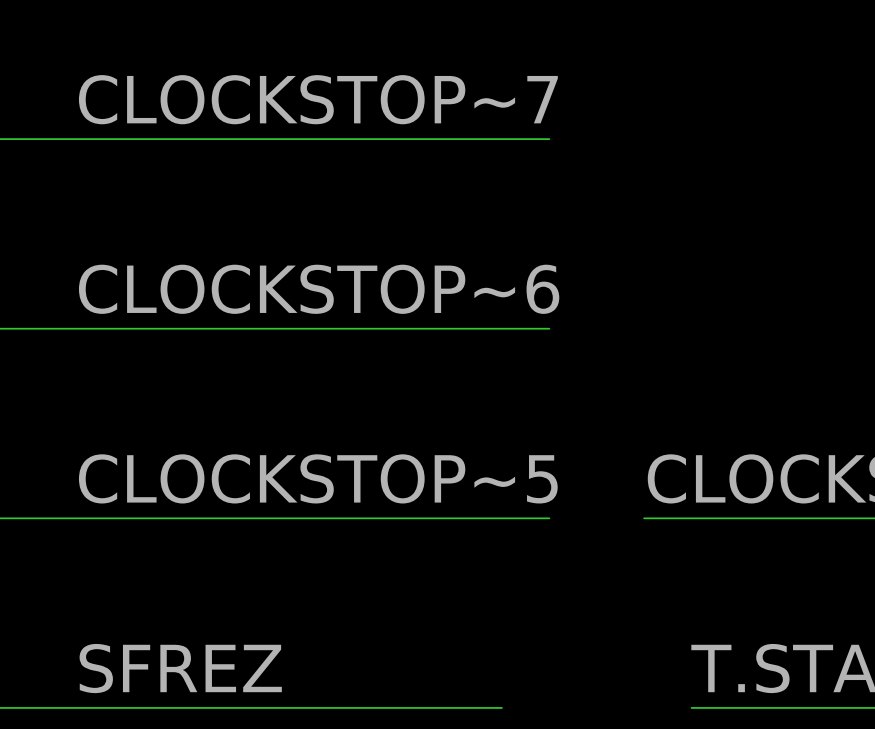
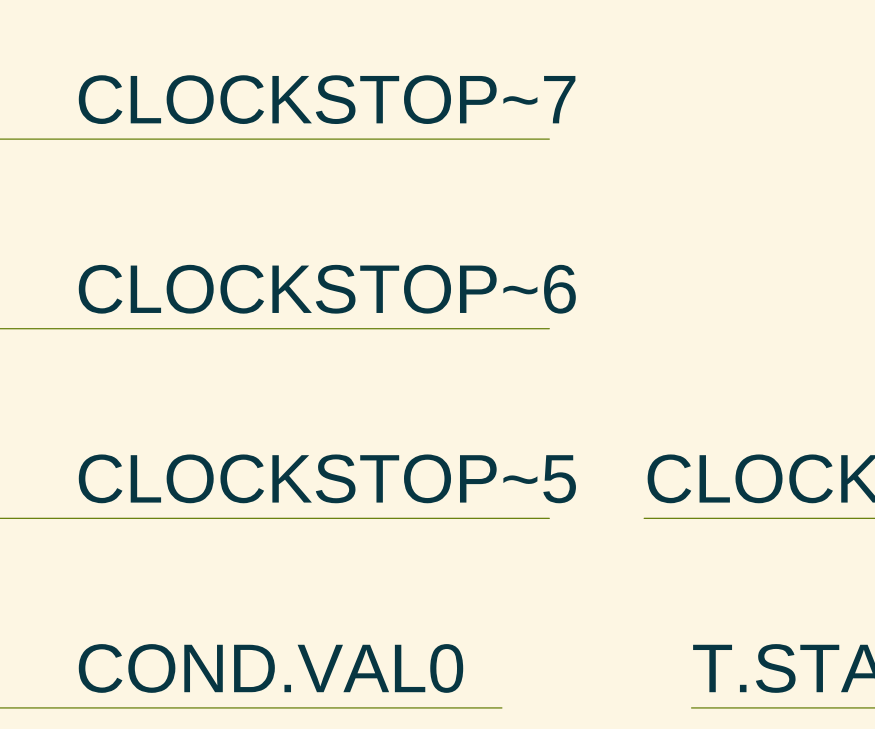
label: SFREZ (180, 668) -> COND.VAL0 (270, 668)

